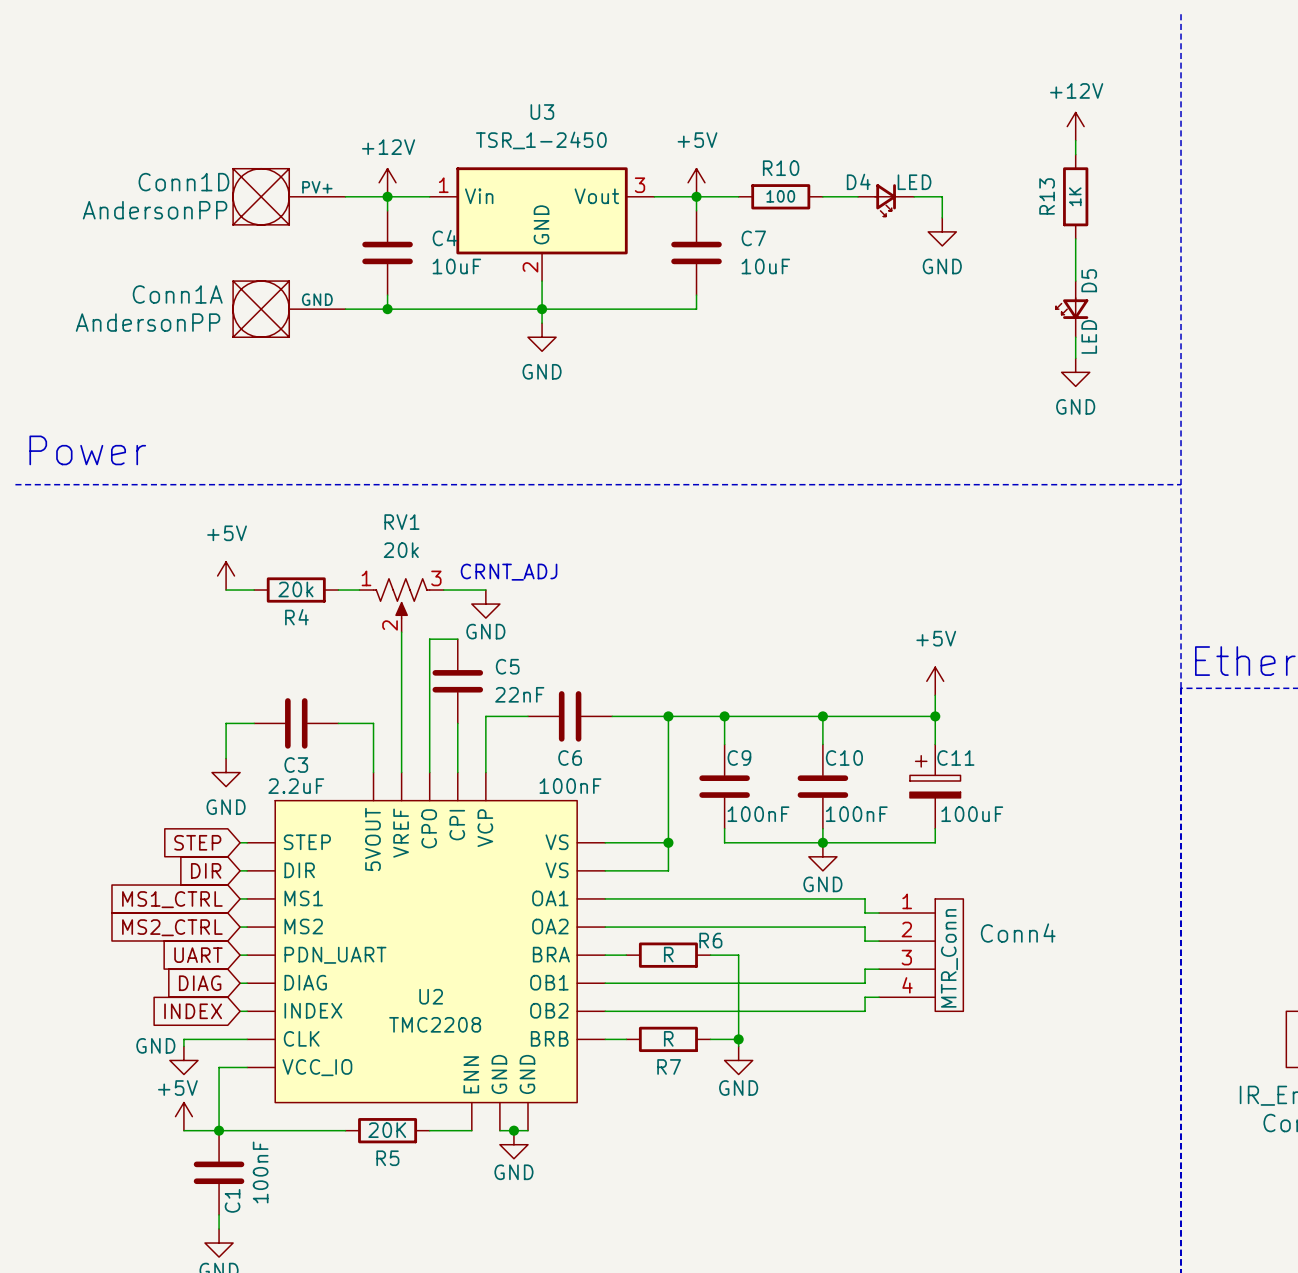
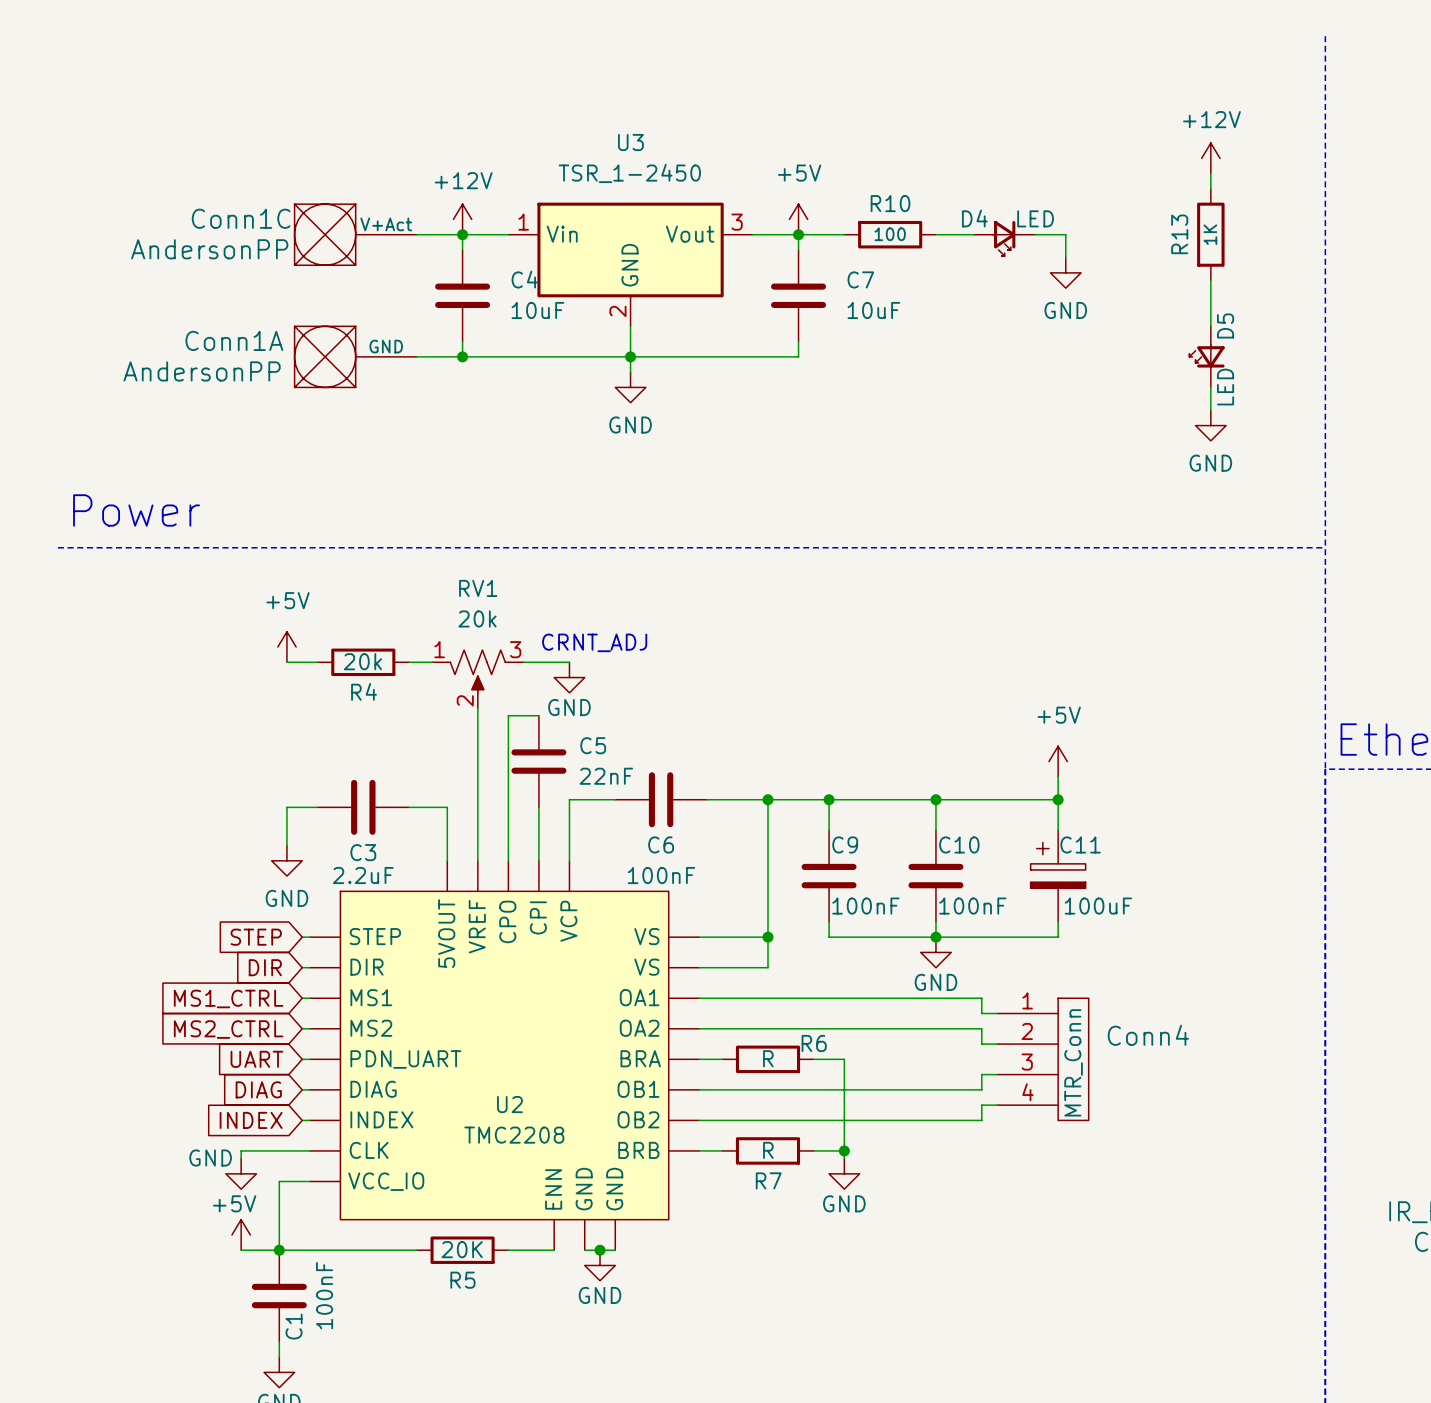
Conn1D name: Conn1D (183, 182) -> Conn1C (241, 218)
Conn1D pin name: PV+ (317, 187) -> V+Act (386, 224)

